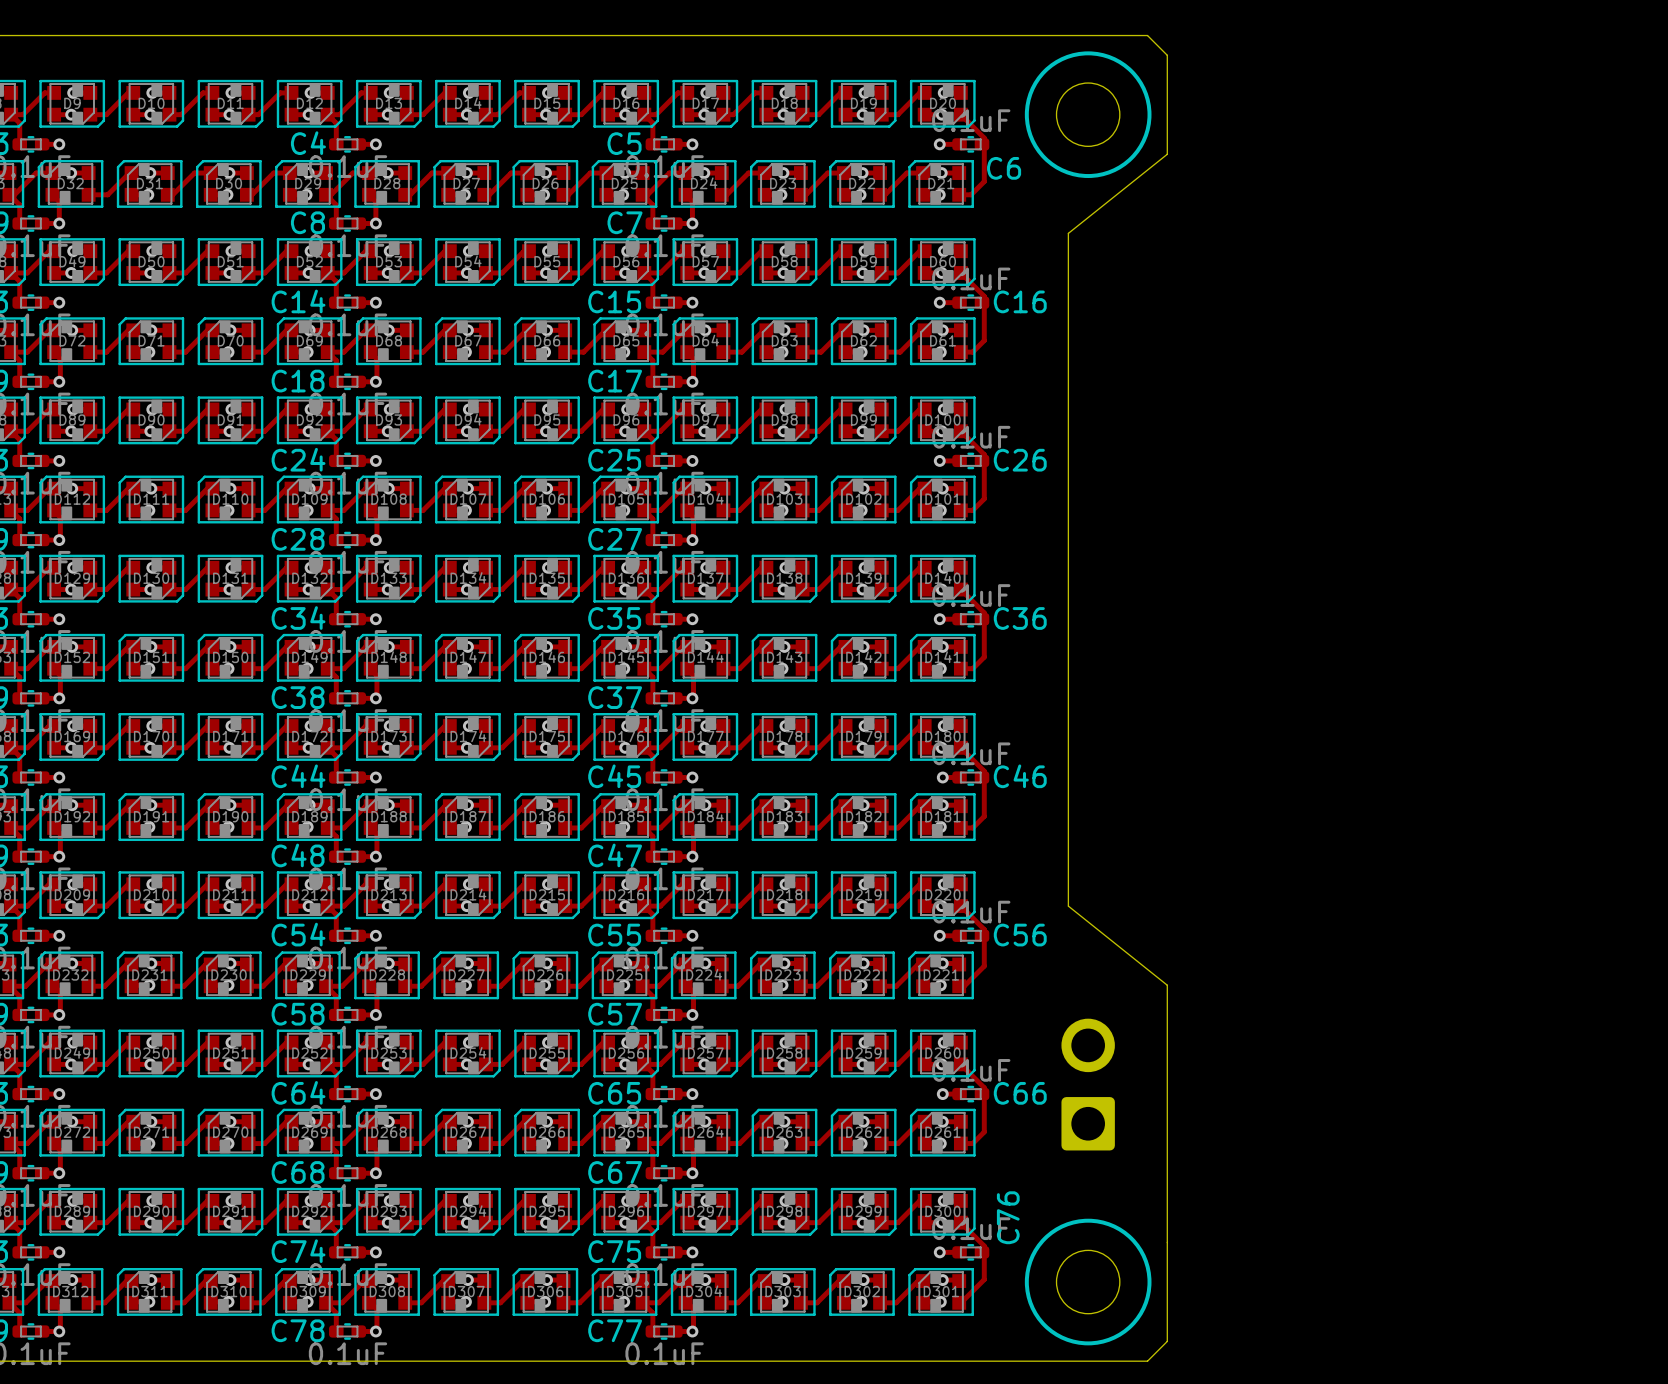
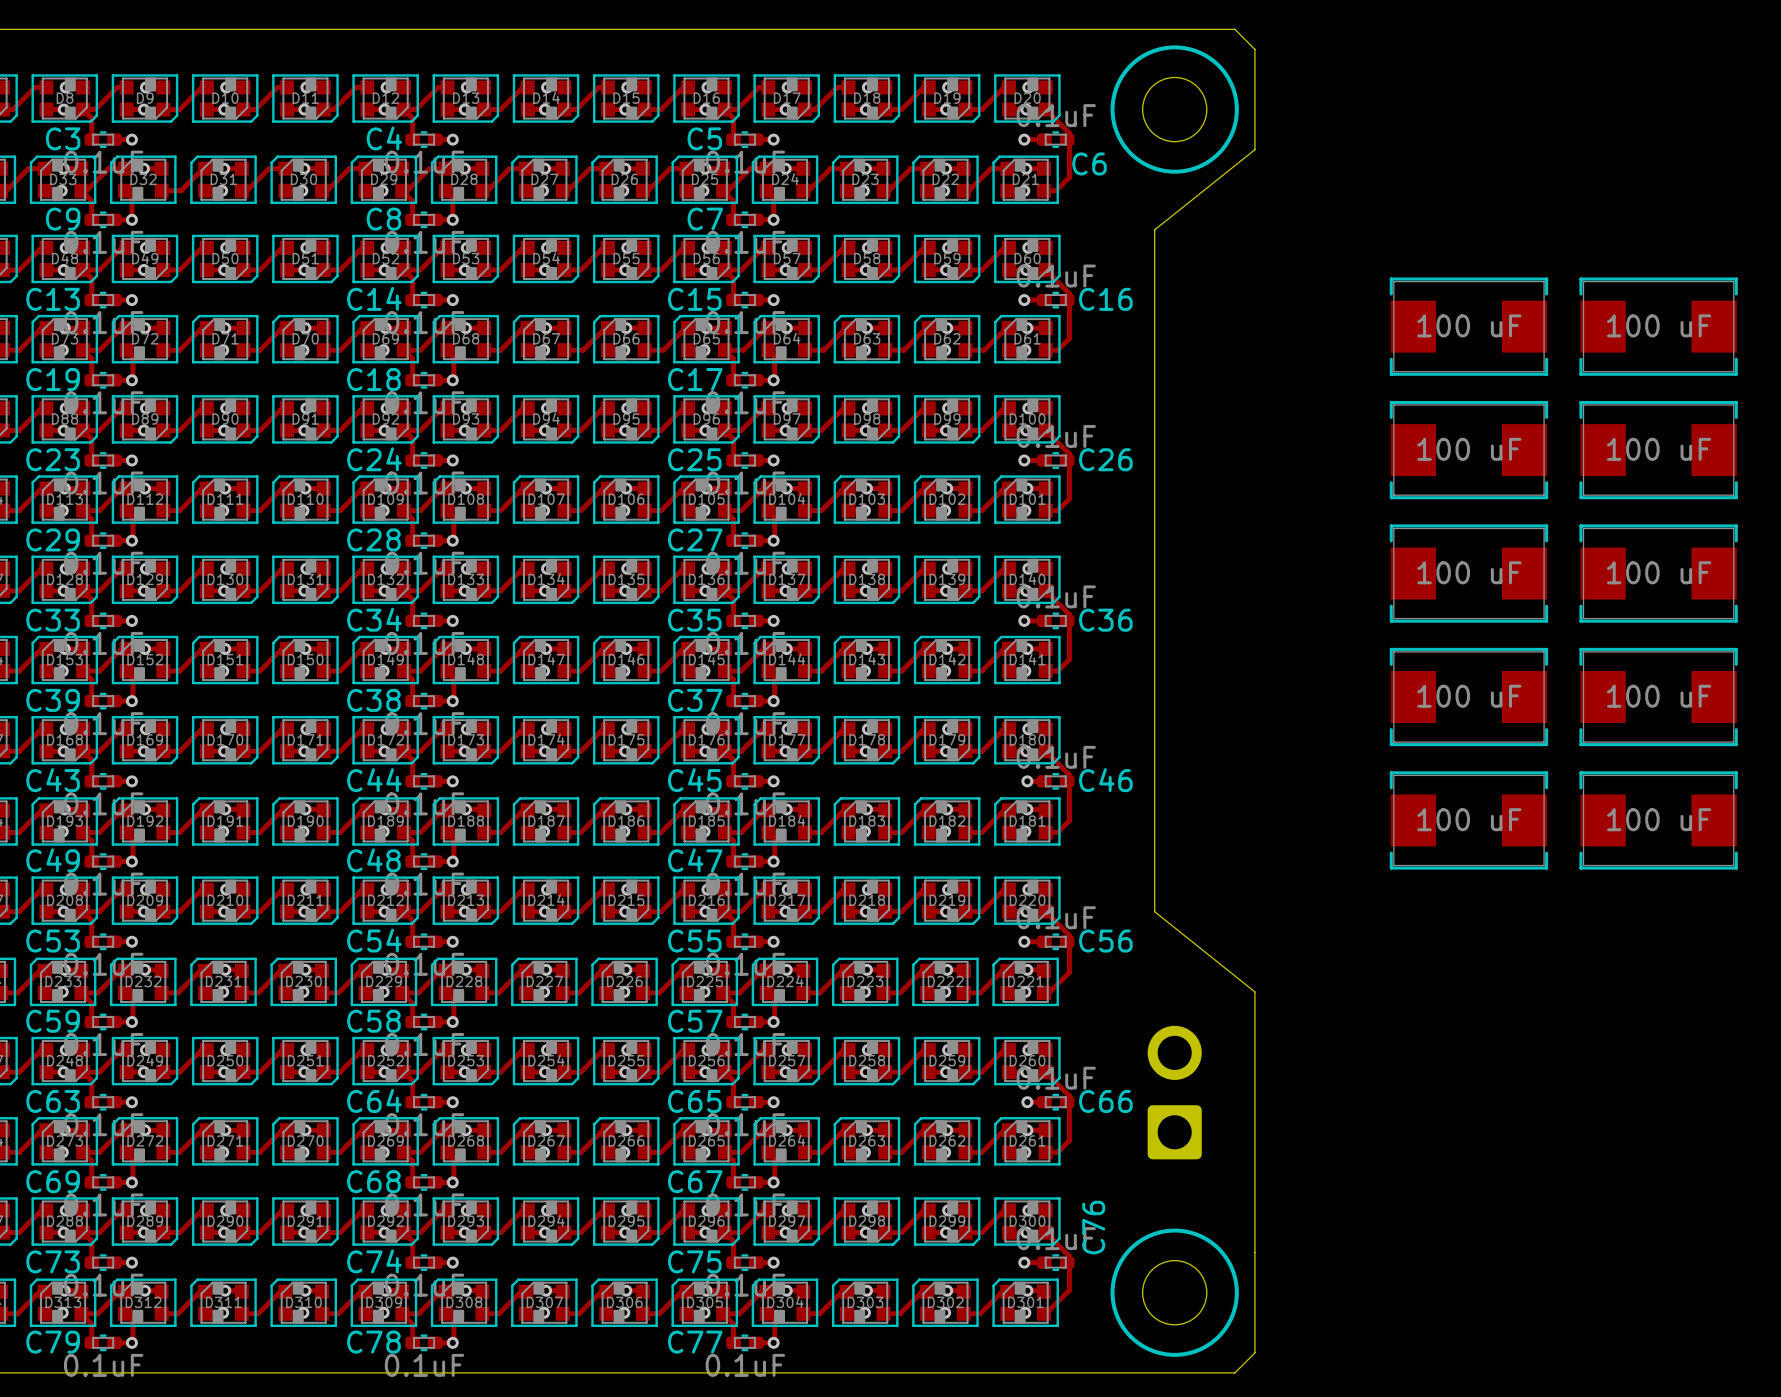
part: none -> 100 uF (1468, 326)
part: none -> 100 uF (1658, 326)
part: none -> 100 uF (1468, 450)
part: none -> 100 uF (1658, 450)
part: none -> 100 uF (1468, 573)
part: none -> 100 uF (1658, 573)
part: none -> 100 uF (1468, 697)
part: none -> 100 uF (1658, 697)
part: none -> 100 uF (1468, 820)
part: none -> 100 uF (1658, 820)

